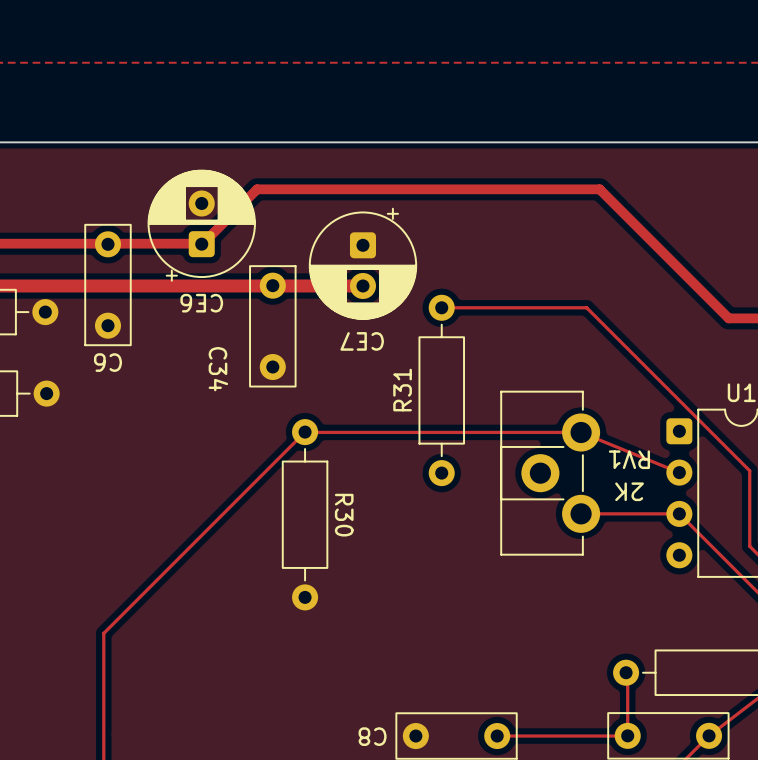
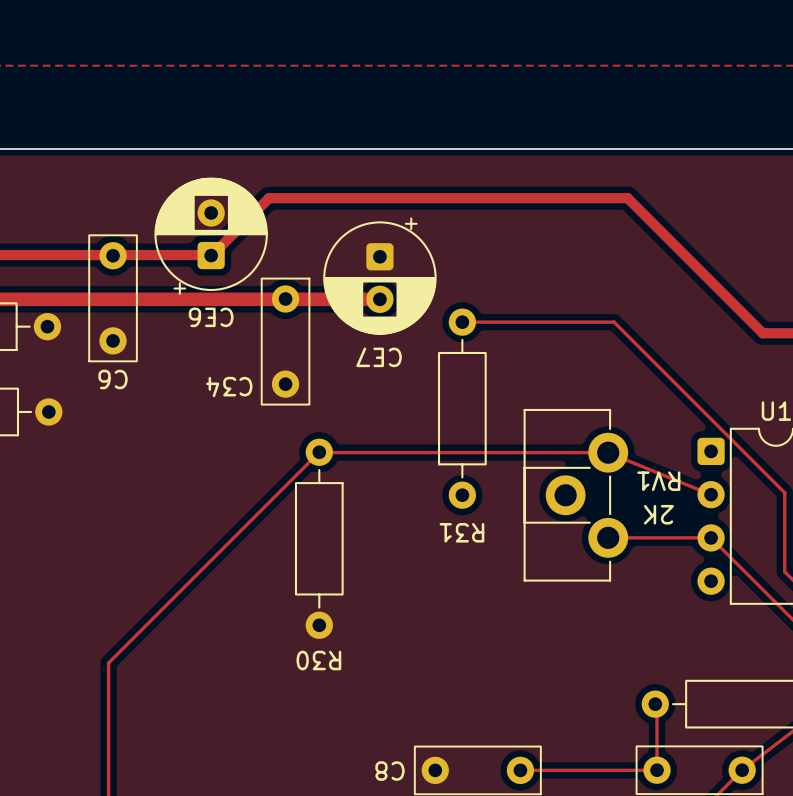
C34 name rotation: 0° (218, 369) -> 90° clockwise (229, 387)
R31 name rotation: 0° (402, 390) -> 90° counterclockwise (461, 532)
R31 name position: R31 (402, 390) -> R31 (461, 532)
R30 name rotation: 0° (344, 515) -> 90° clockwise (318, 660)
R30 name position: R30 (344, 515) -> R30 (318, 660)

